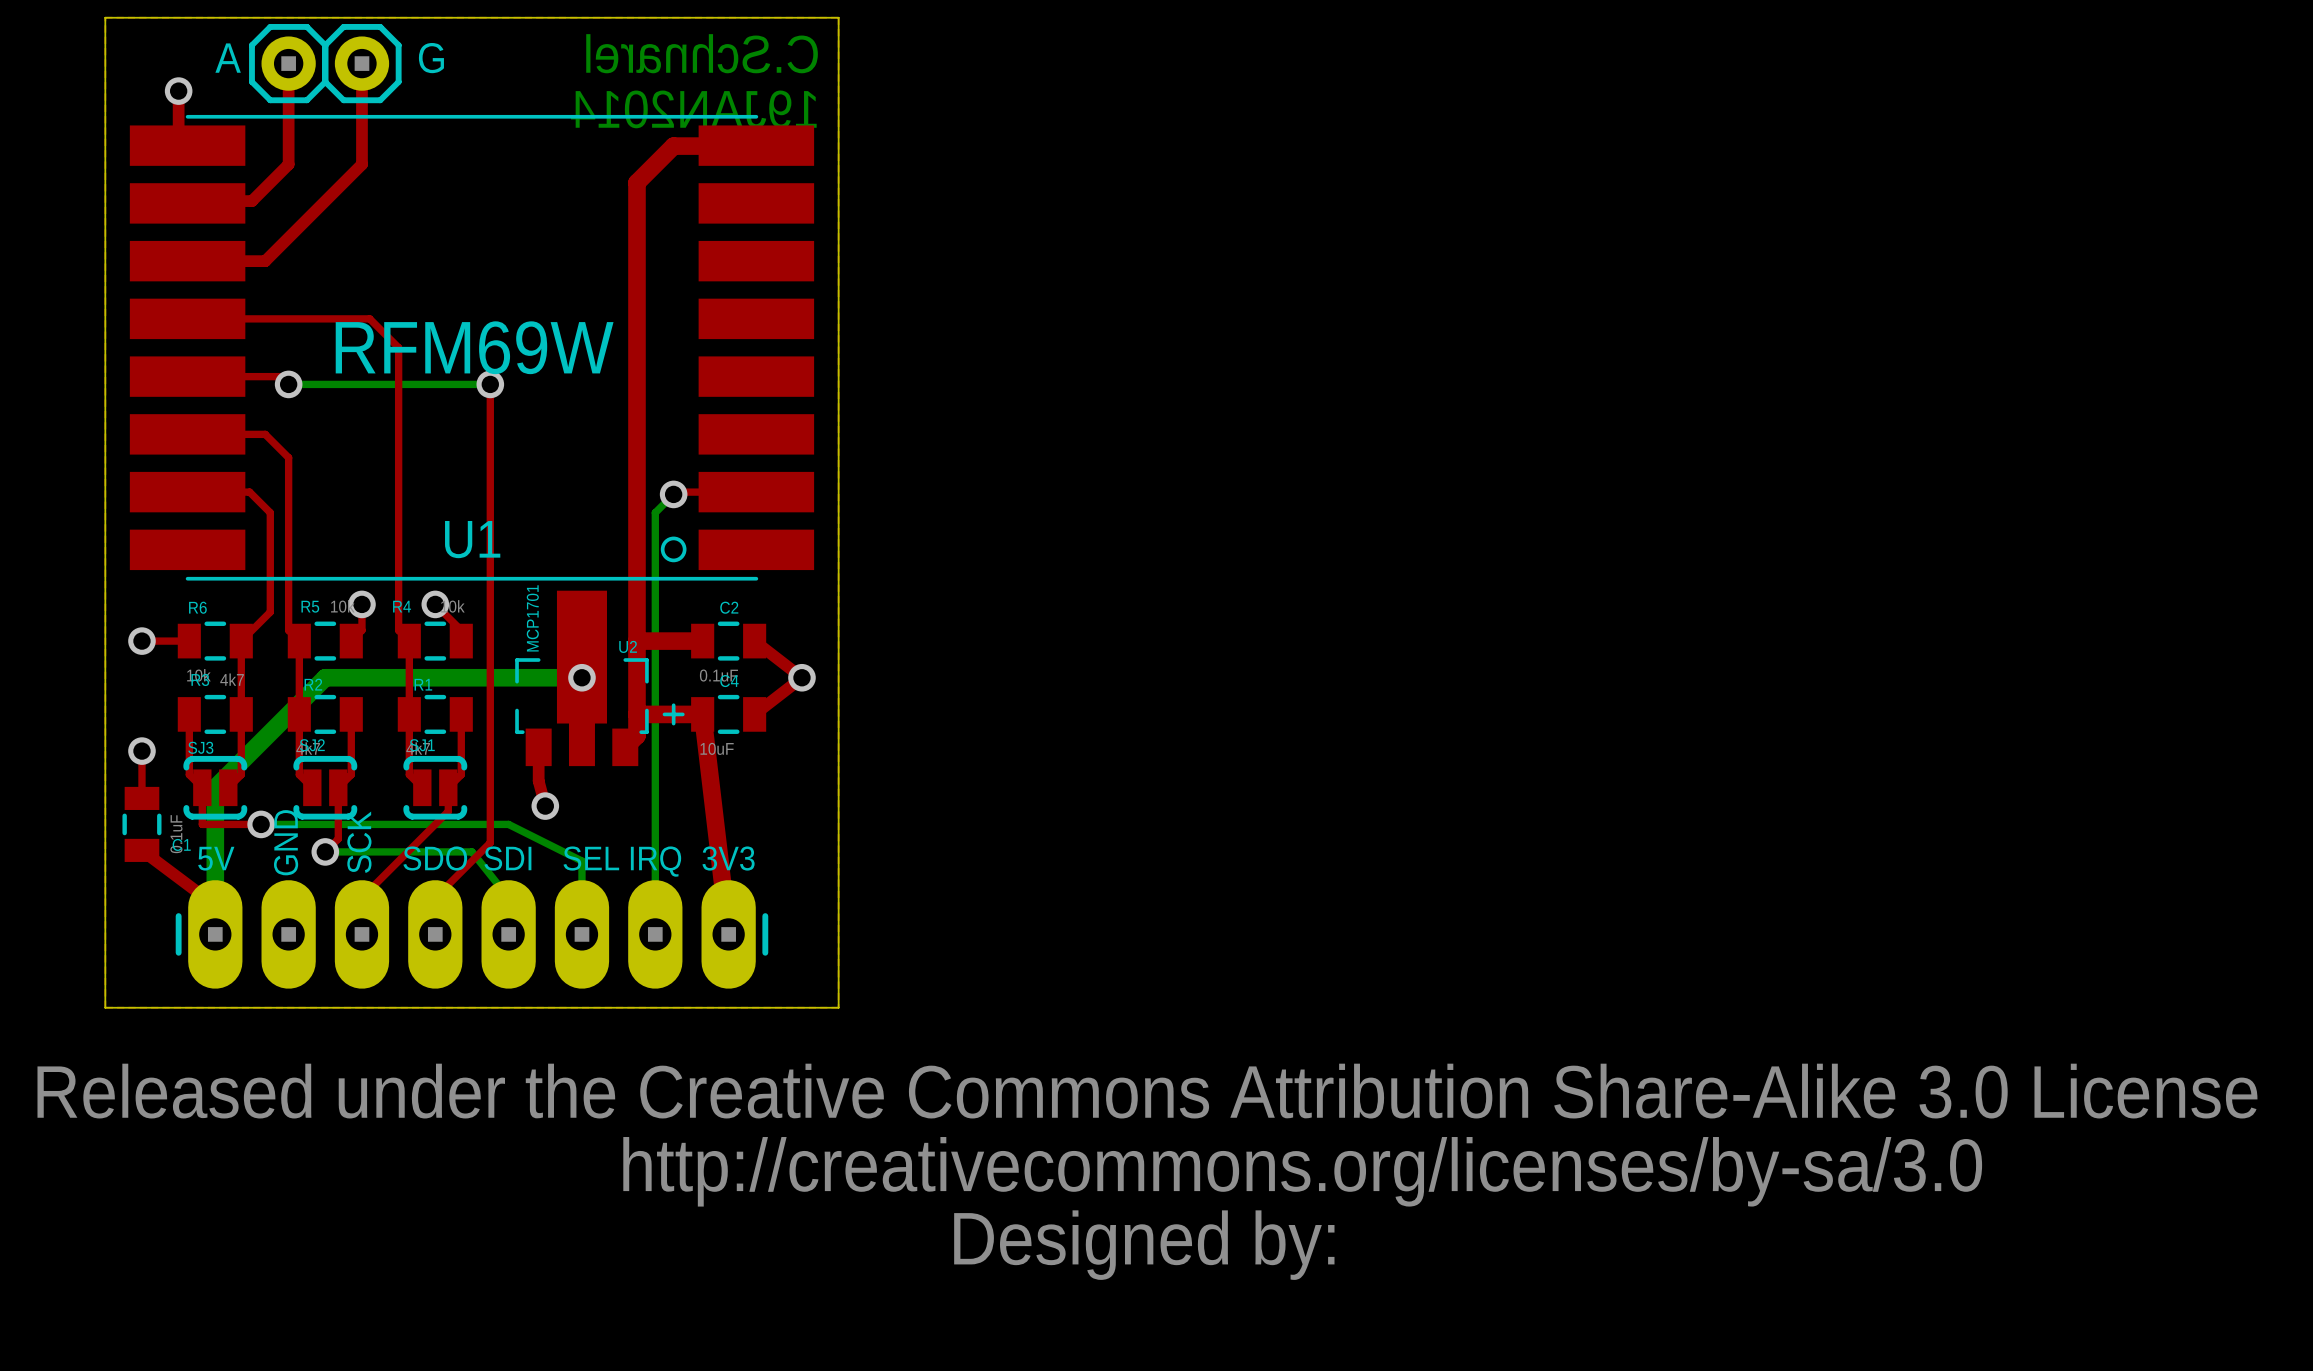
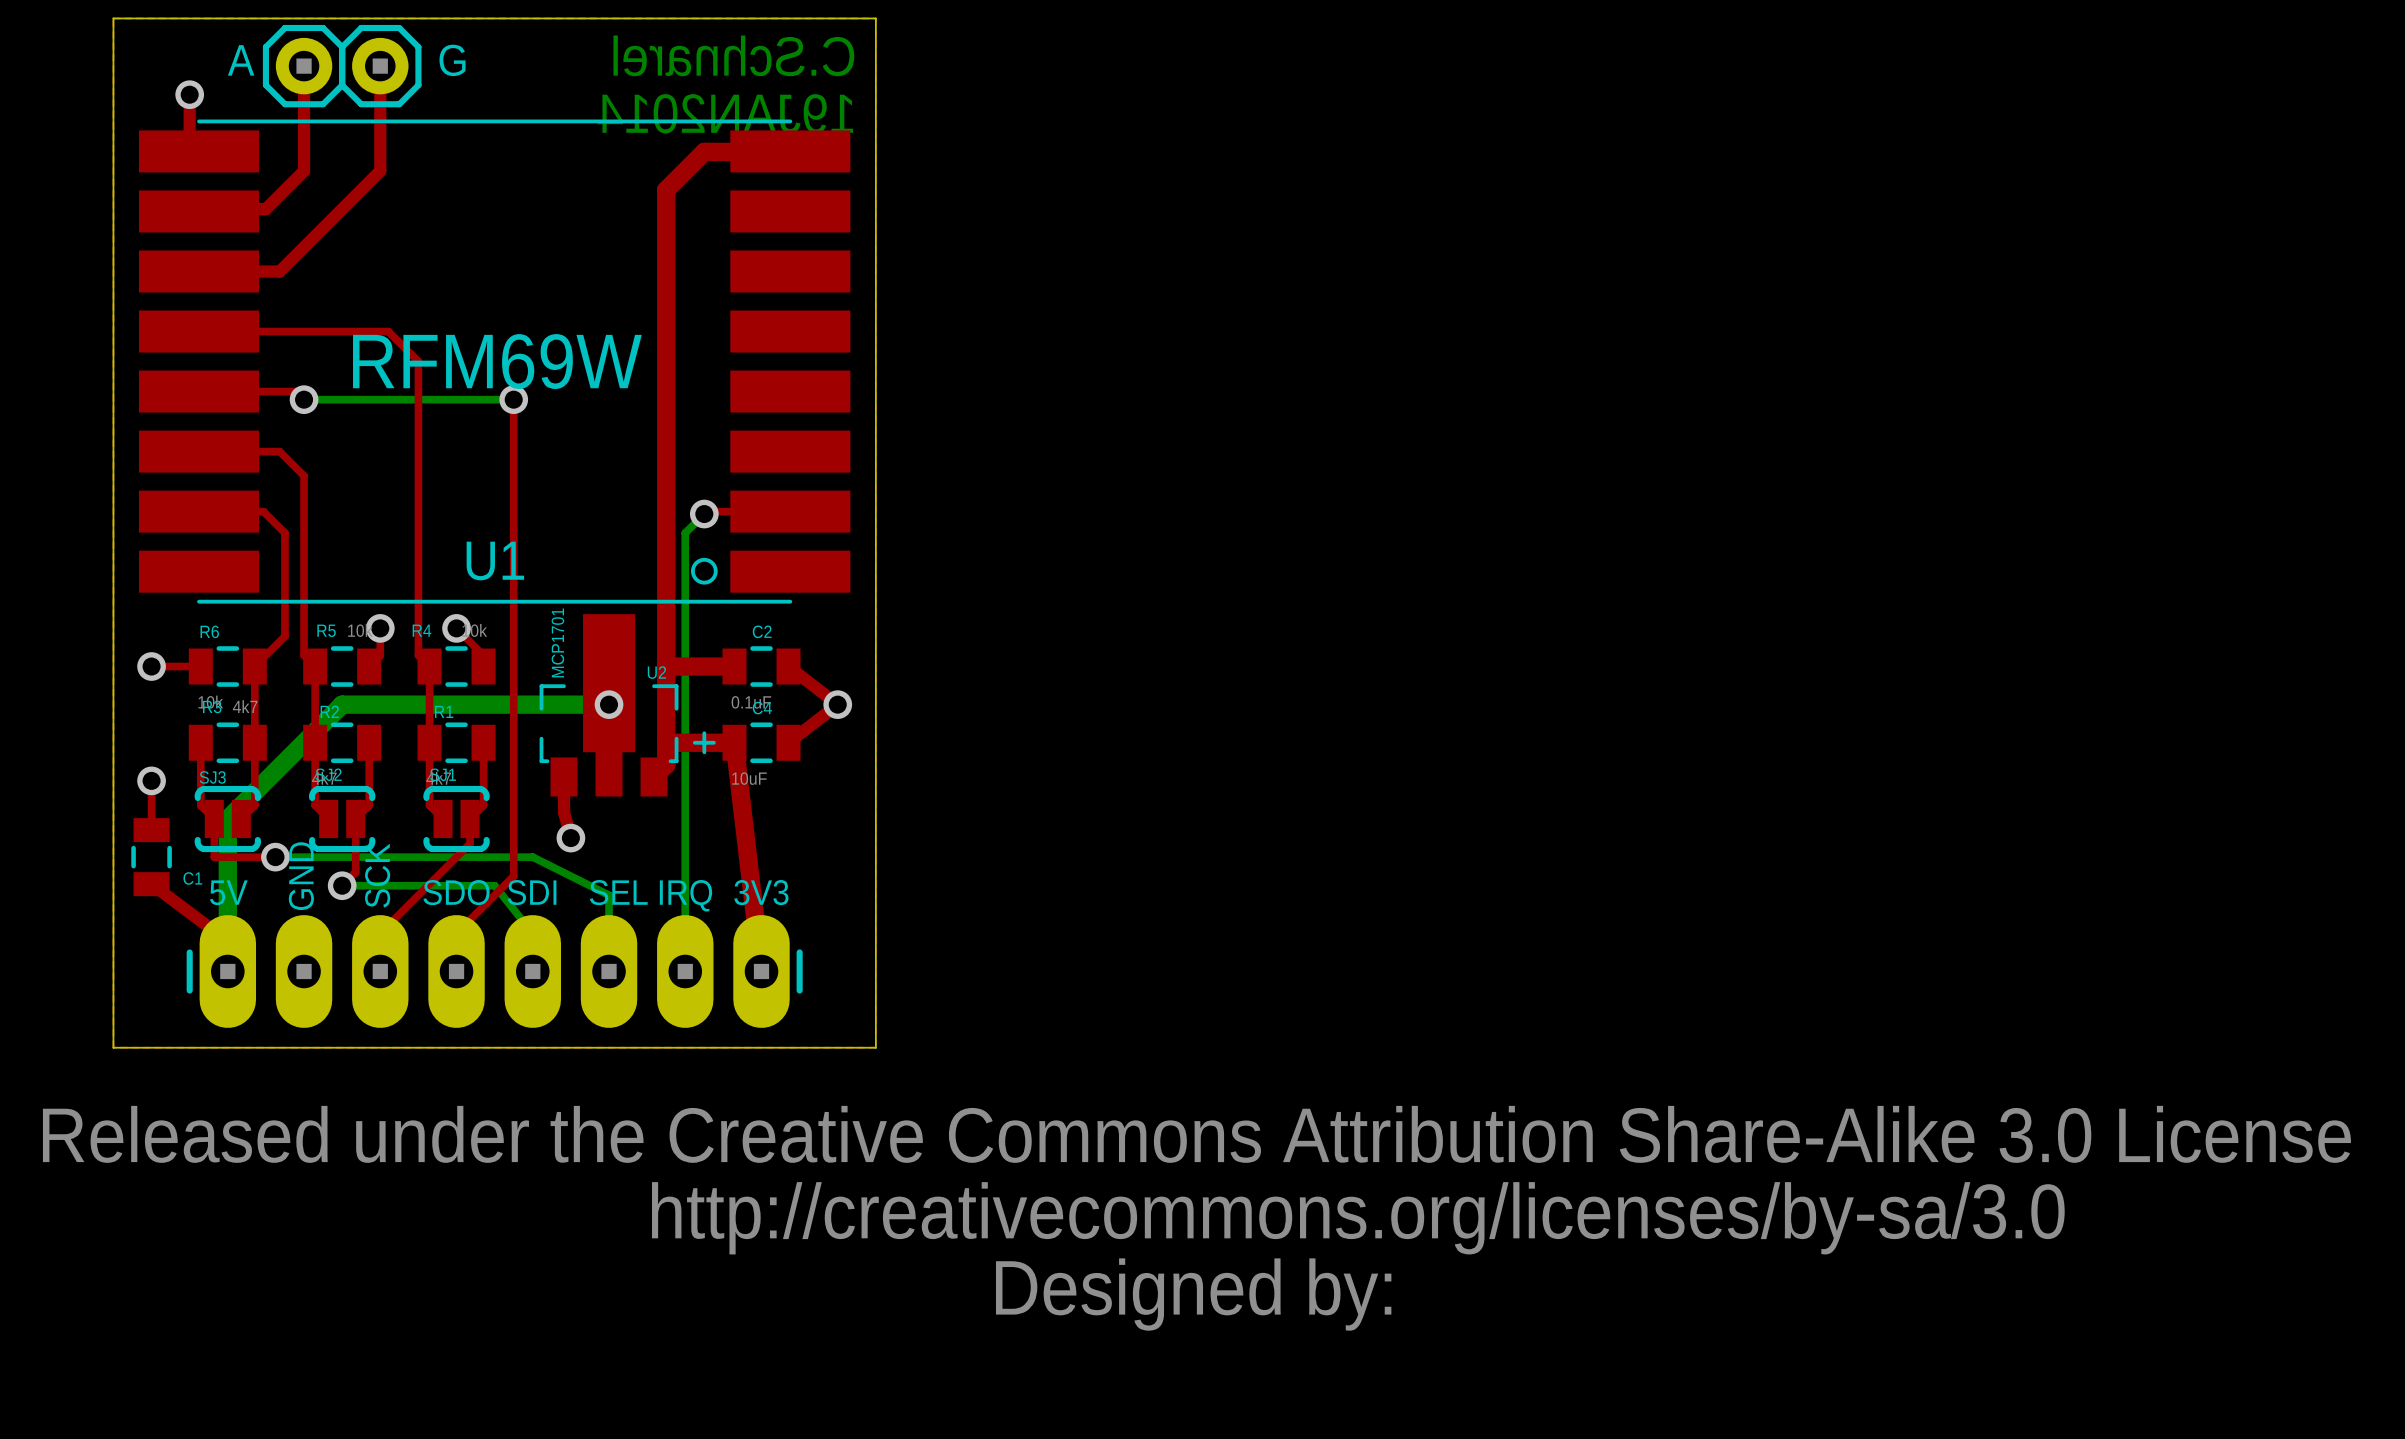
C1 value: 0.1uF (176, 834) -> none

